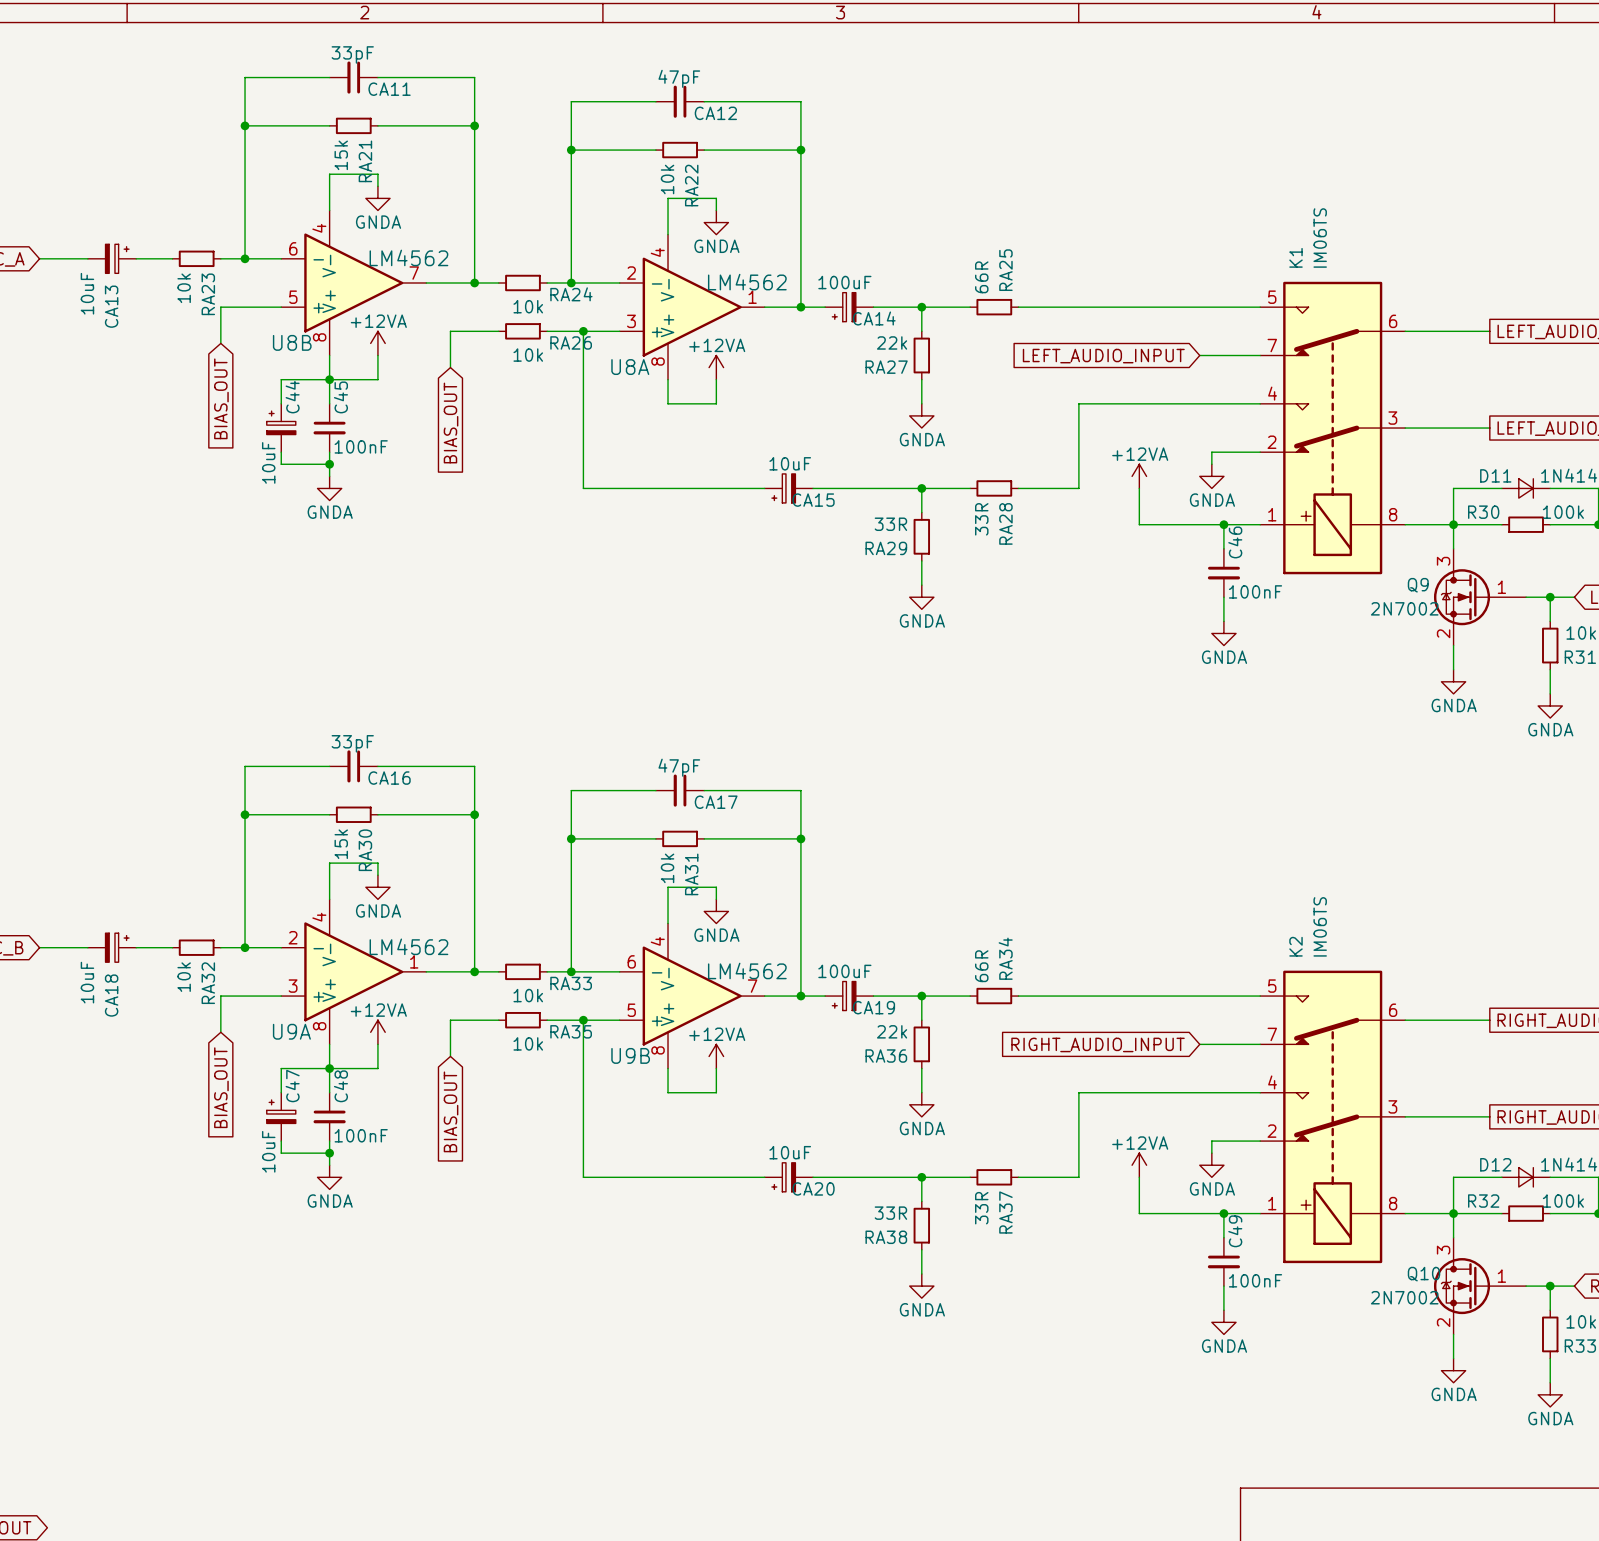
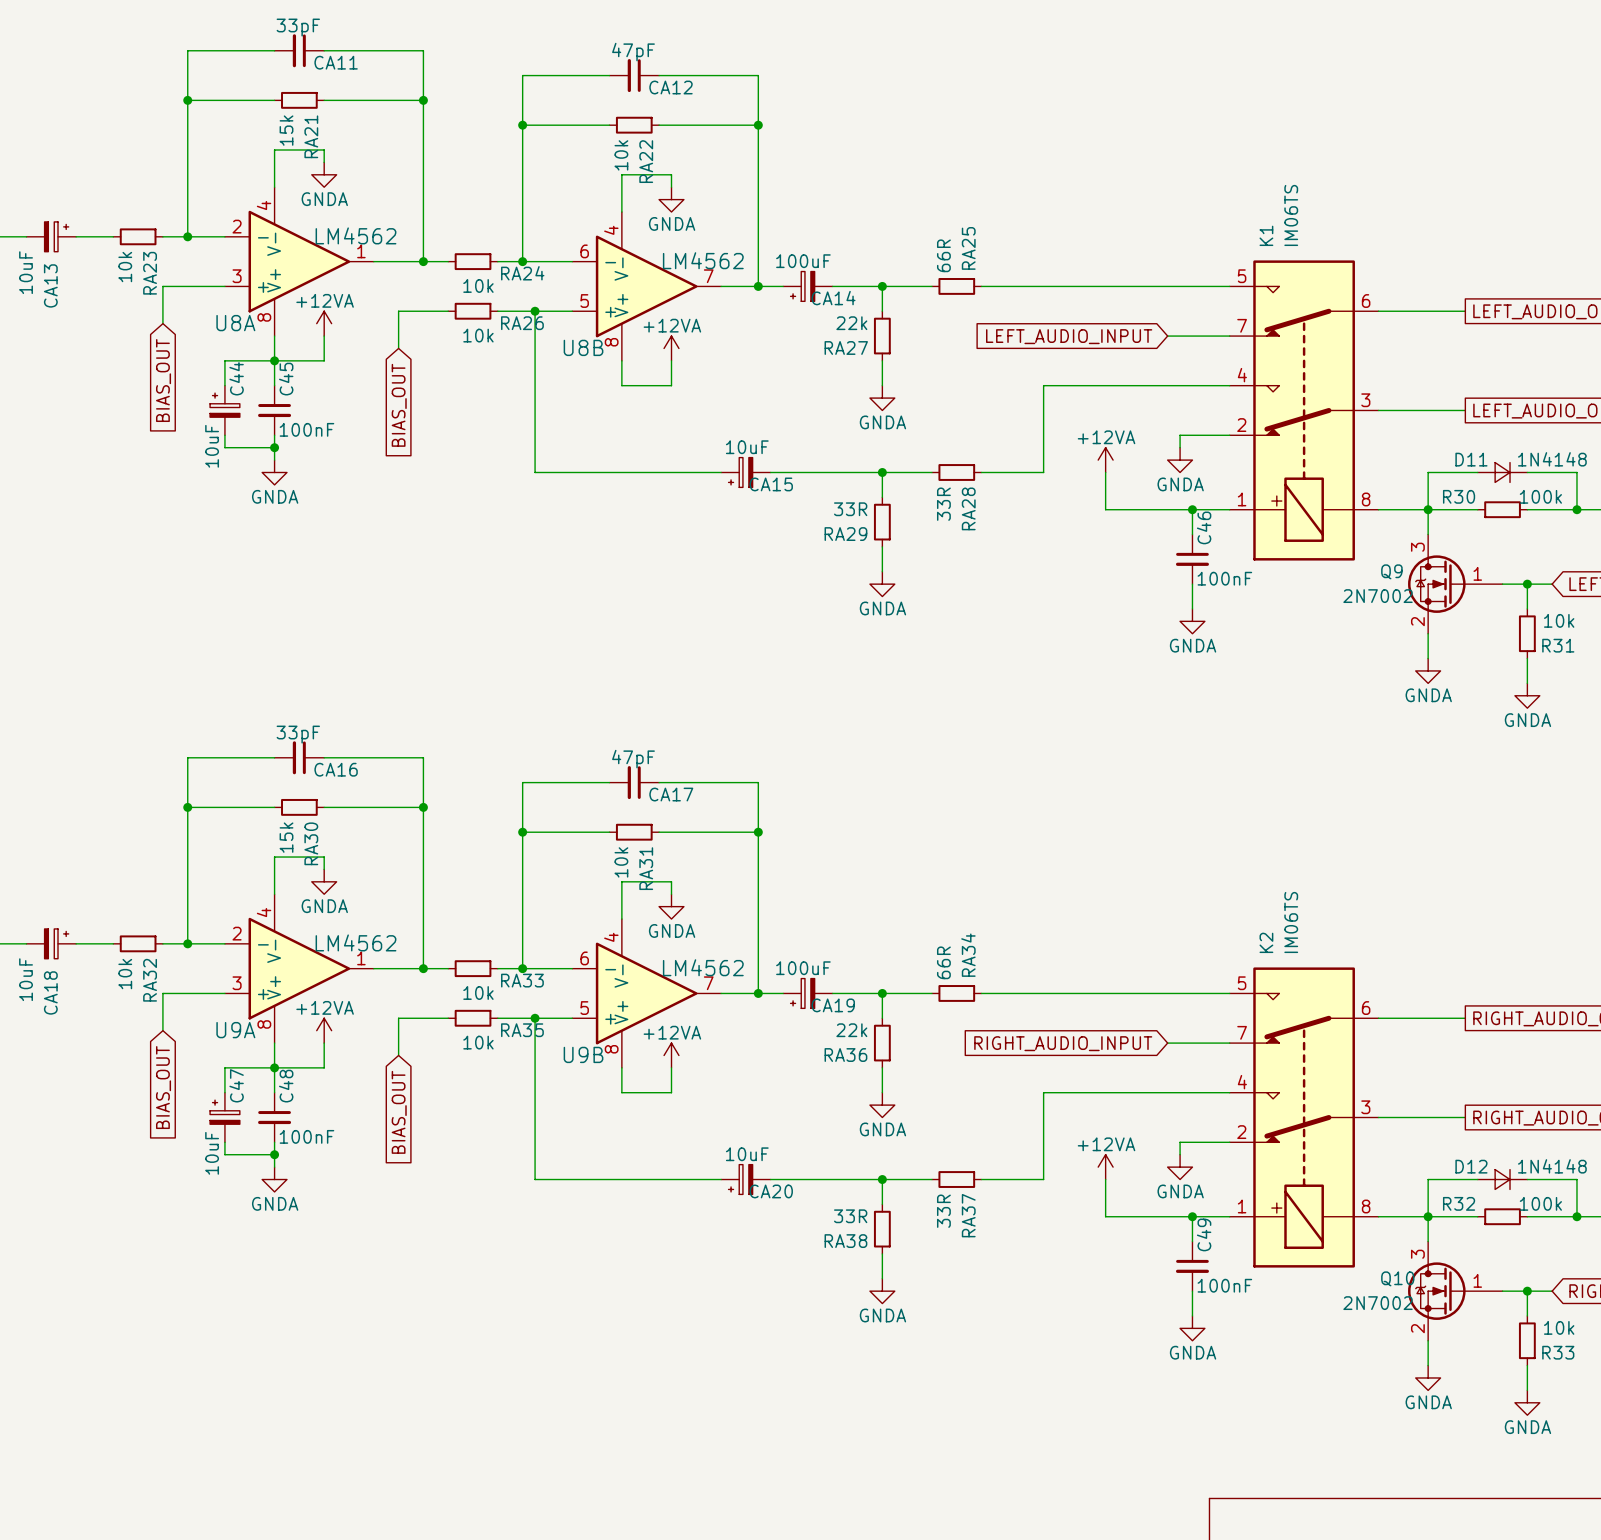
U8B position: (353, 282) -> (646, 286)
U8A position: (692, 307) -> (299, 261)

